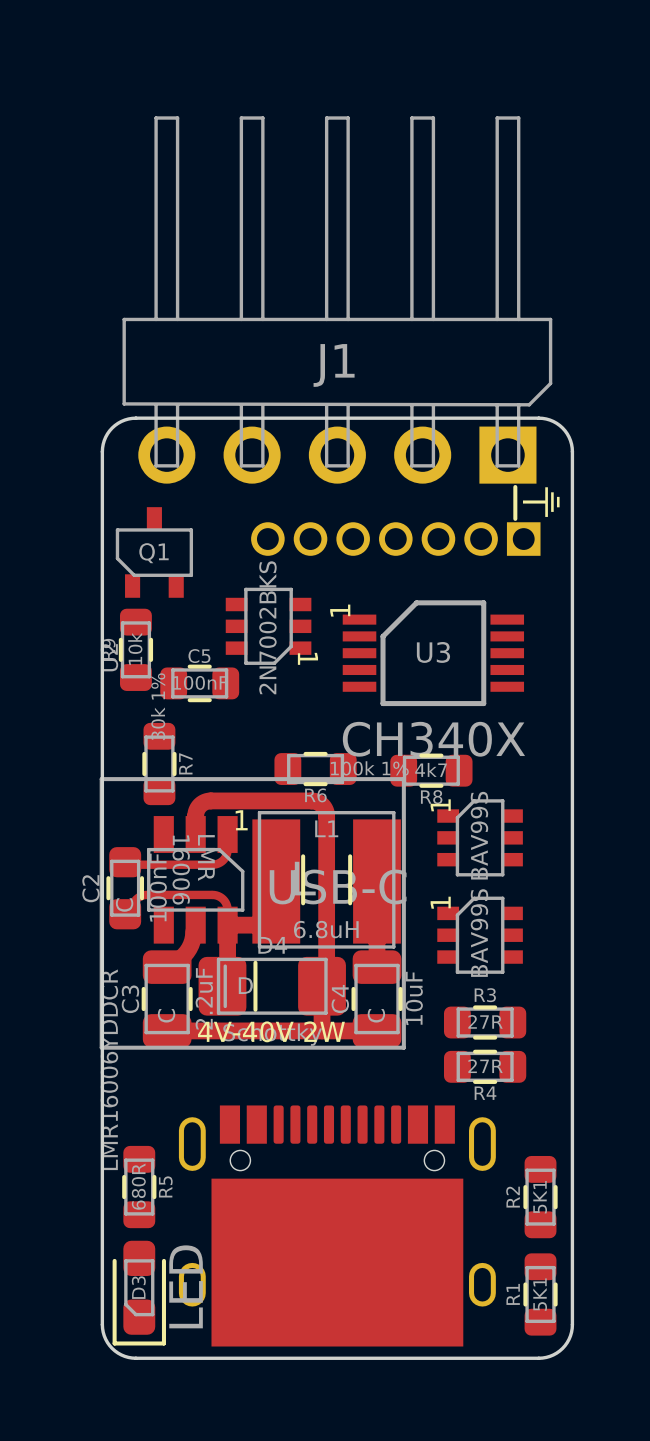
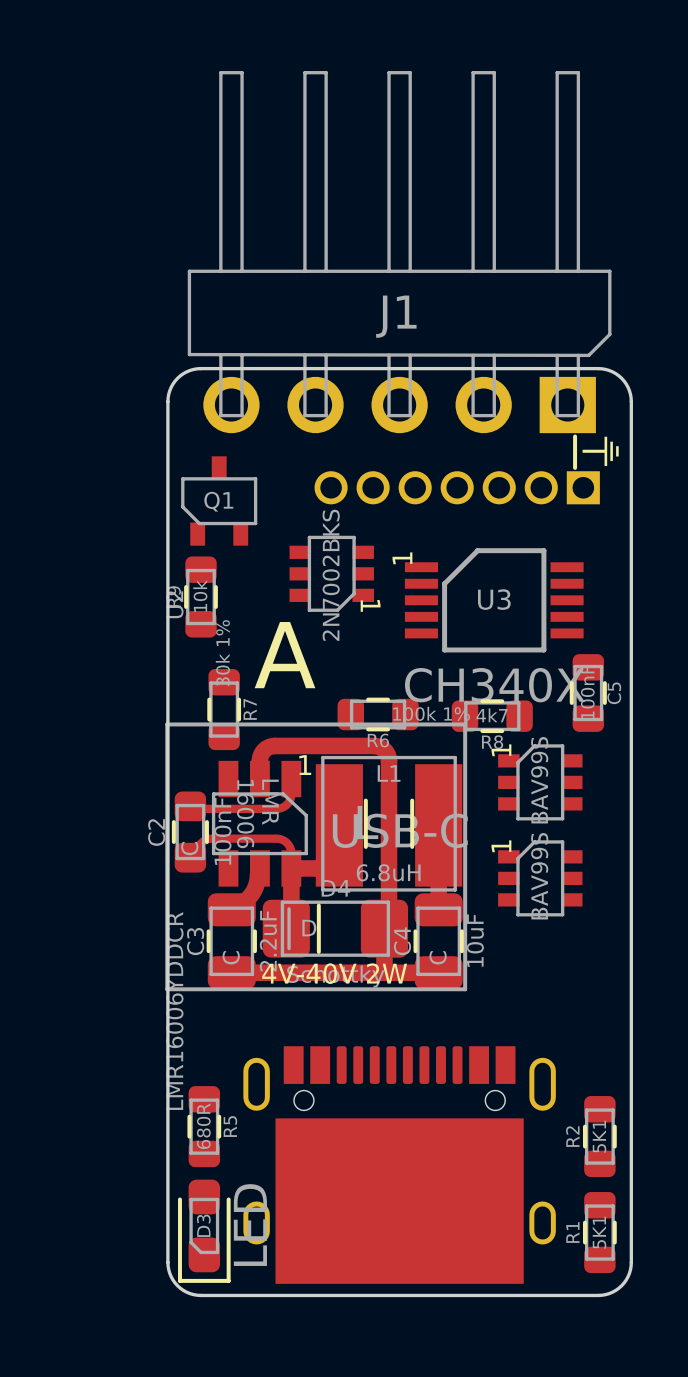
C5 rotation: 0° (199, 683) -> 90° clockwise (588, 693)
C5 position: (199, 683) -> (588, 693)
text: none -> A (285, 655)
R3: 27R (485, 1022) -> none
R4: 27R (485, 1066) -> none

